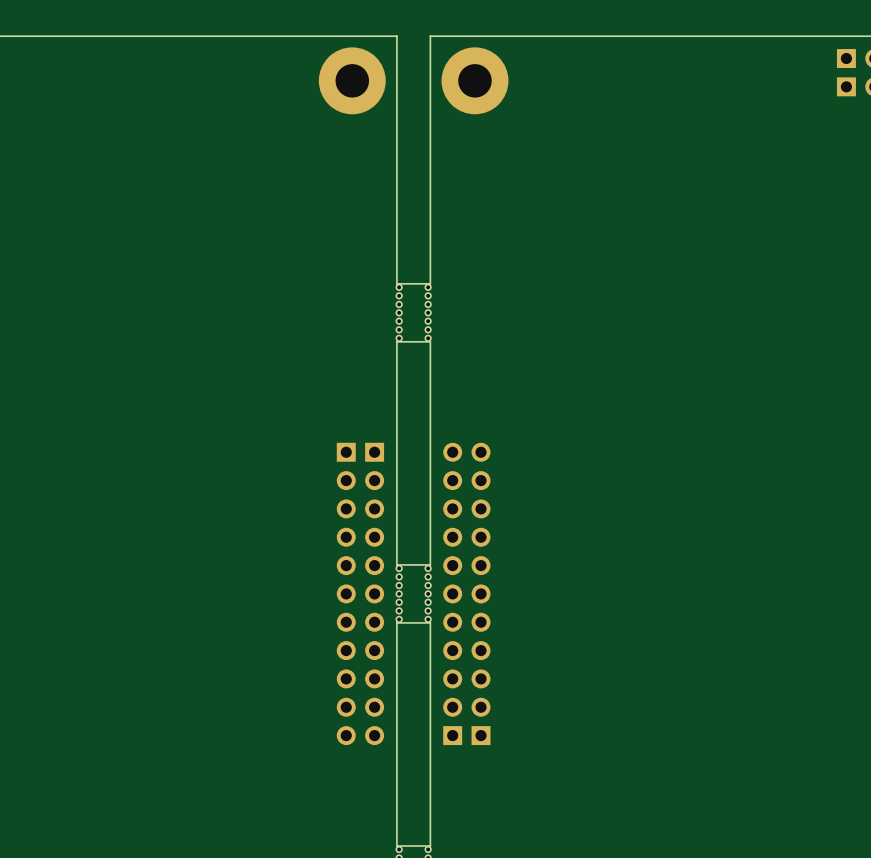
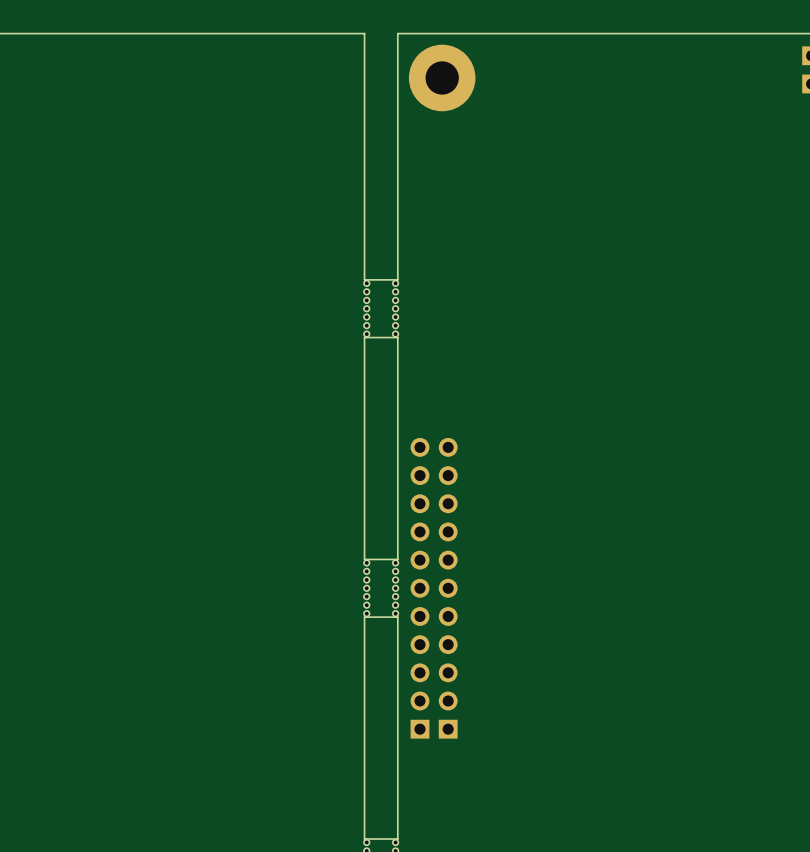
part: (352, 80) -> none
part: (346, 593) -> none
part: (374, 593) -> none

